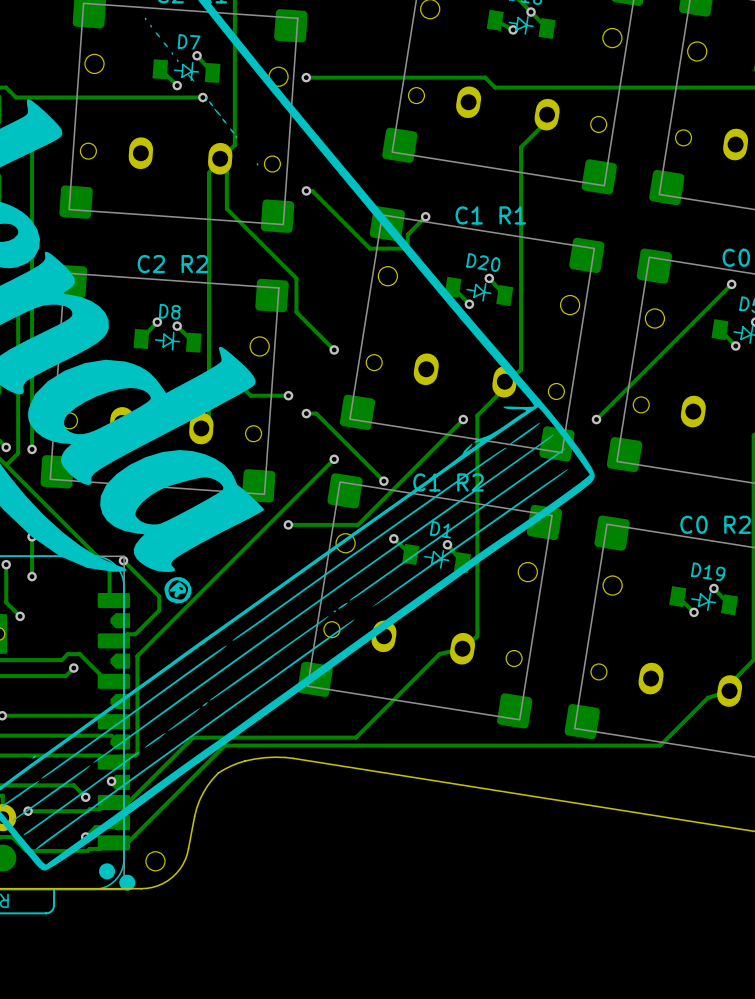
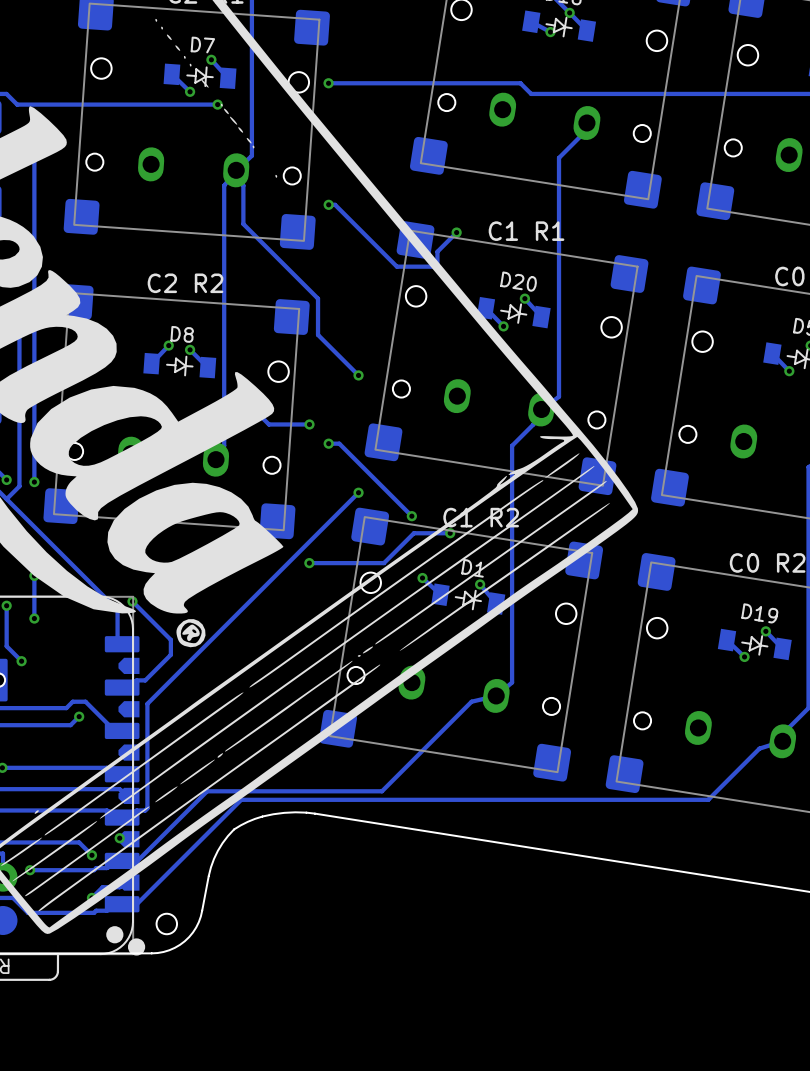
track: (731, 284) (596, 419) -> none
via: (731, 284) -> none
track: (463, 419) (357, 524) -> (450, 533) (413, 533) (384, 563)
via position: (463, 419) -> (450, 533)
via: (596, 419) -> none

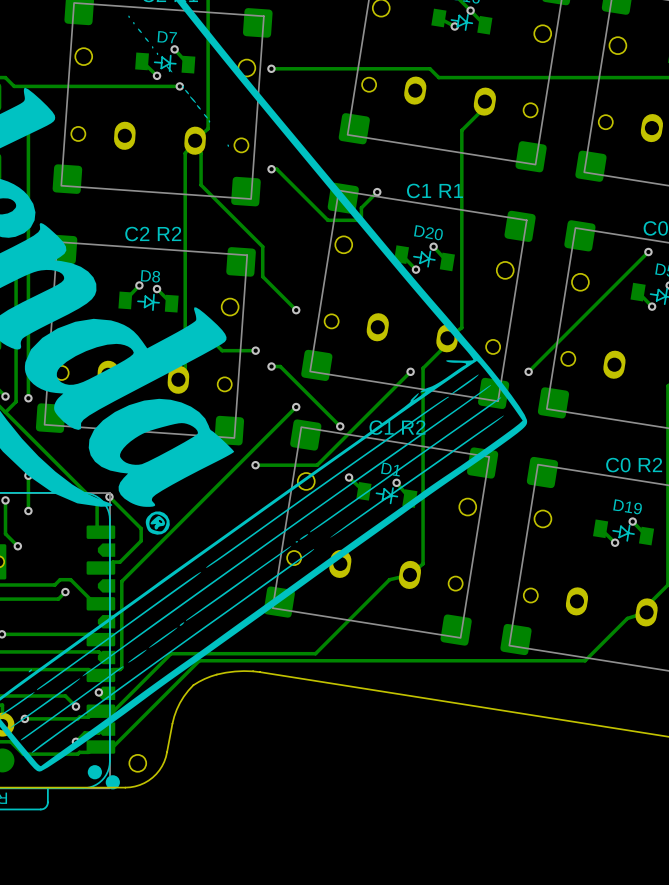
track: none -> (648, 252) (528, 371)
via: none -> (648, 252)
via: none -> (528, 371)
track: (450, 533) (413, 533) (384, 563) -> (410, 371) (317, 465)
via position: (450, 533) -> (410, 371)

